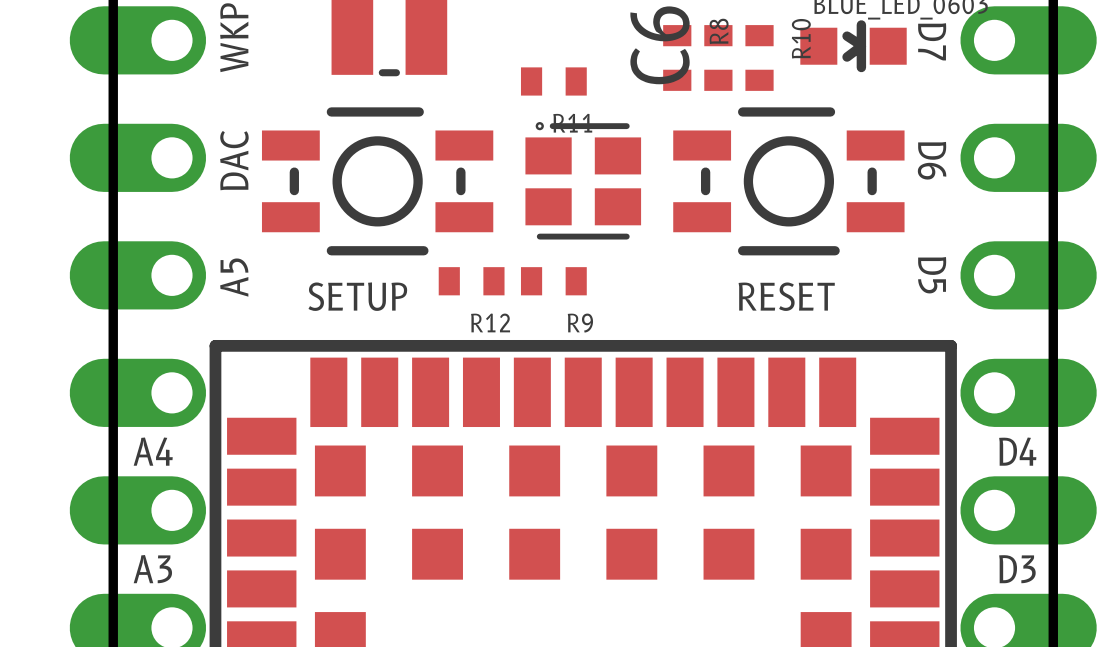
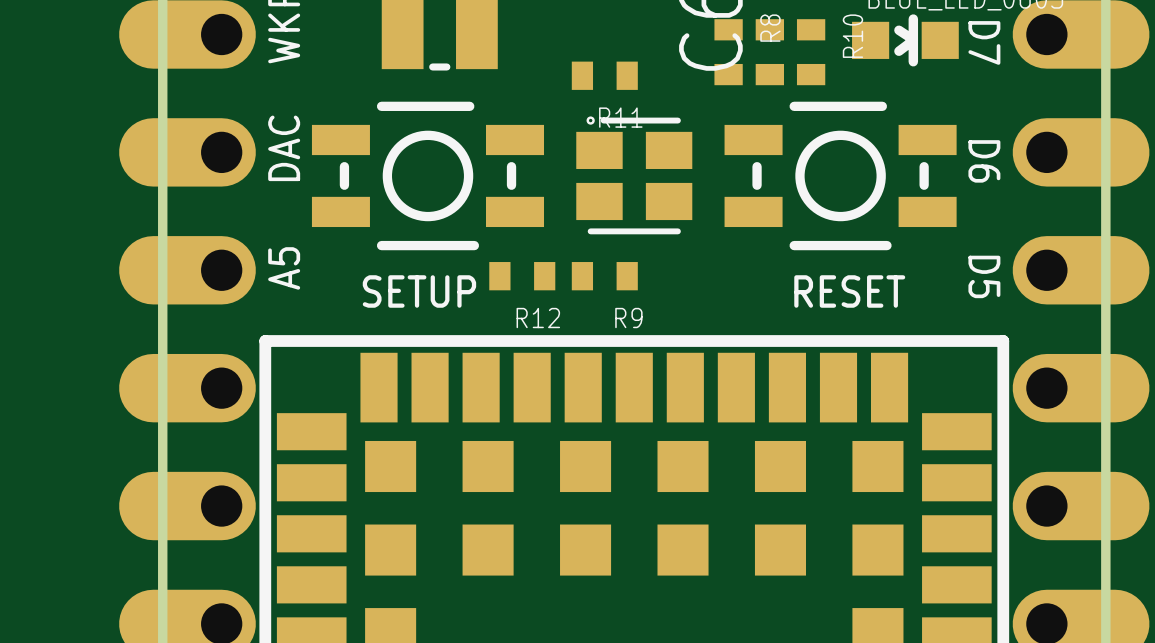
text: A4 (153, 451) -> none
text: D4 (1017, 451) -> none
text: A3 (152, 569) -> none
text: D3 (1017, 569) -> none

